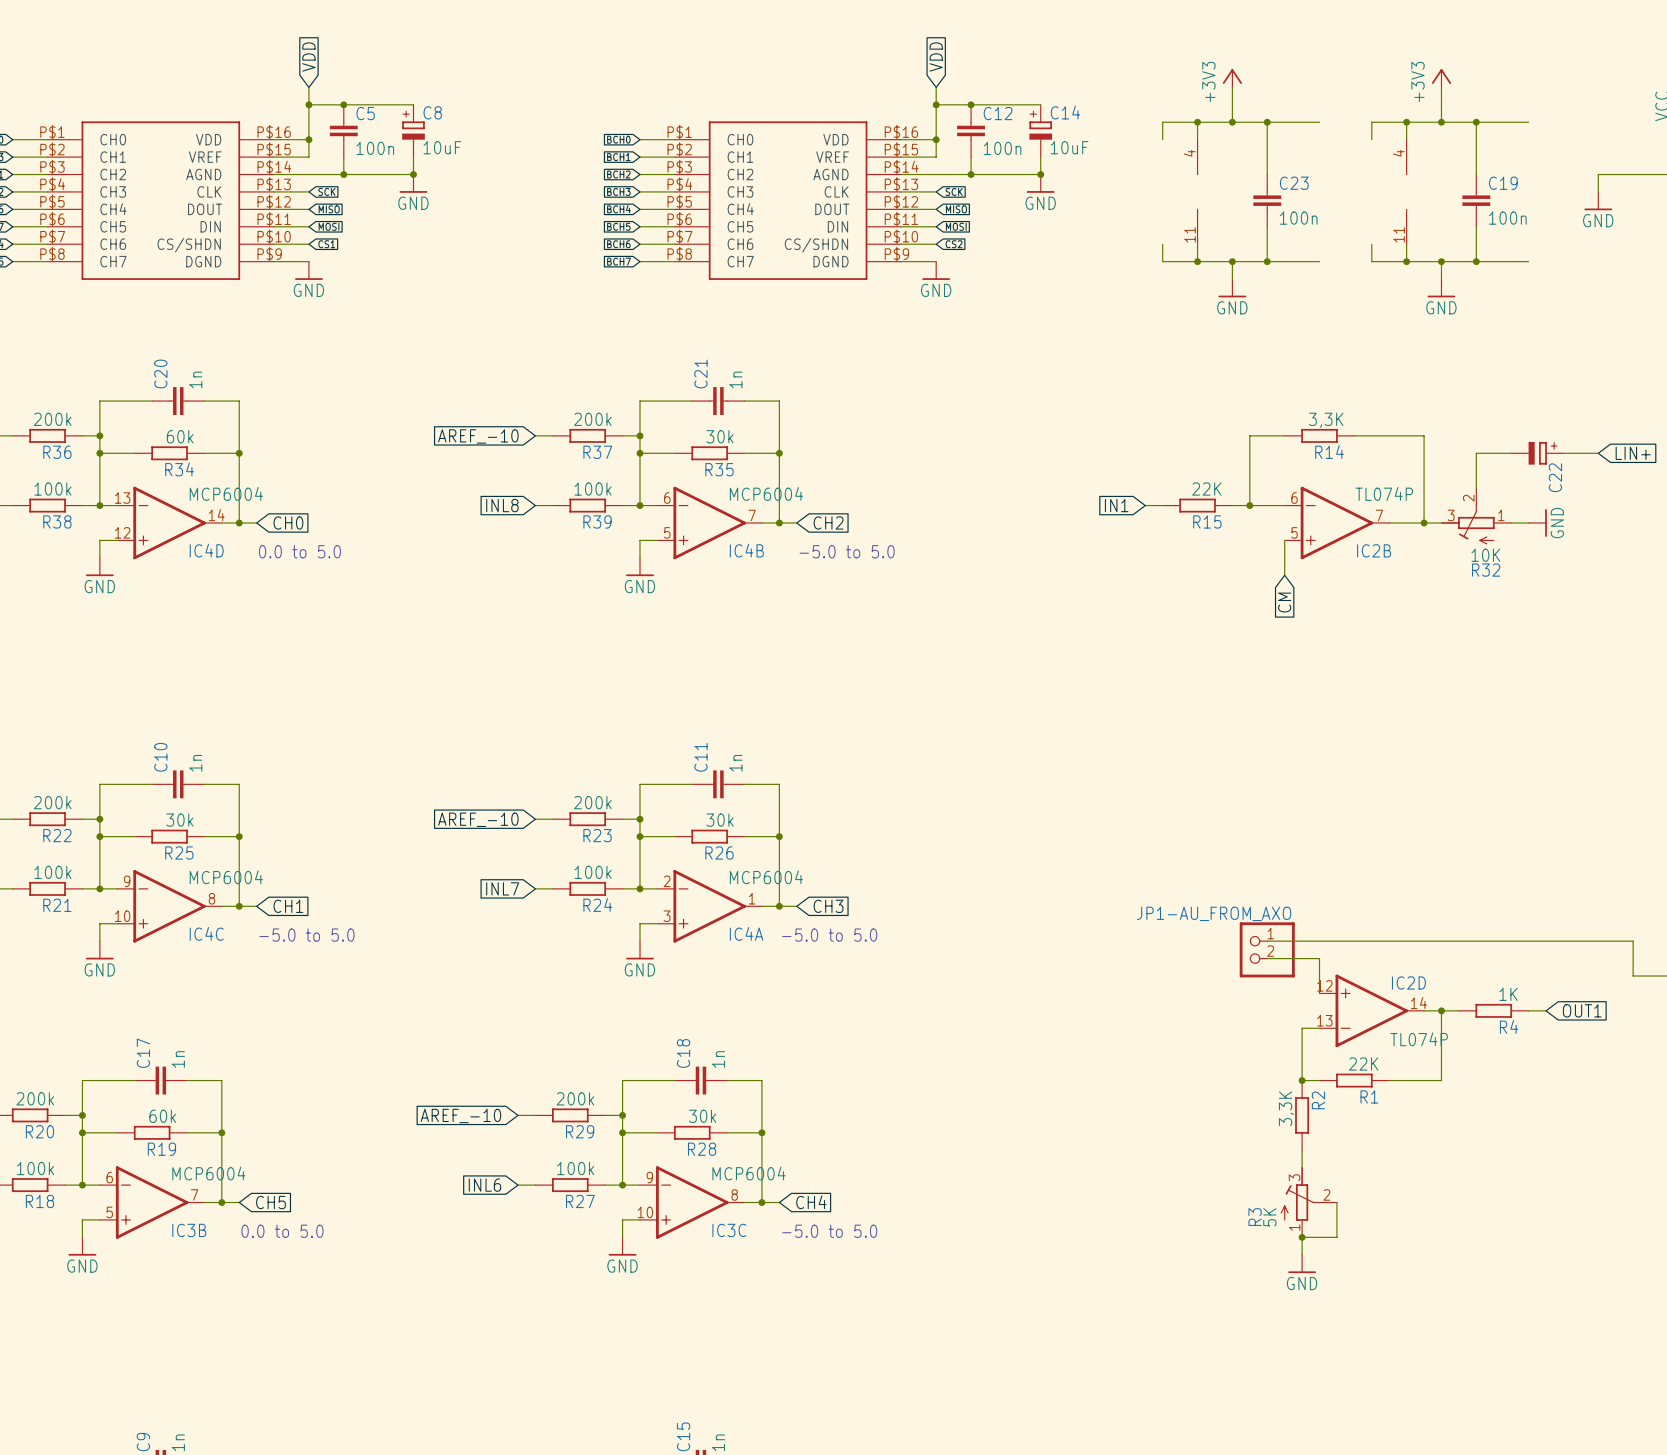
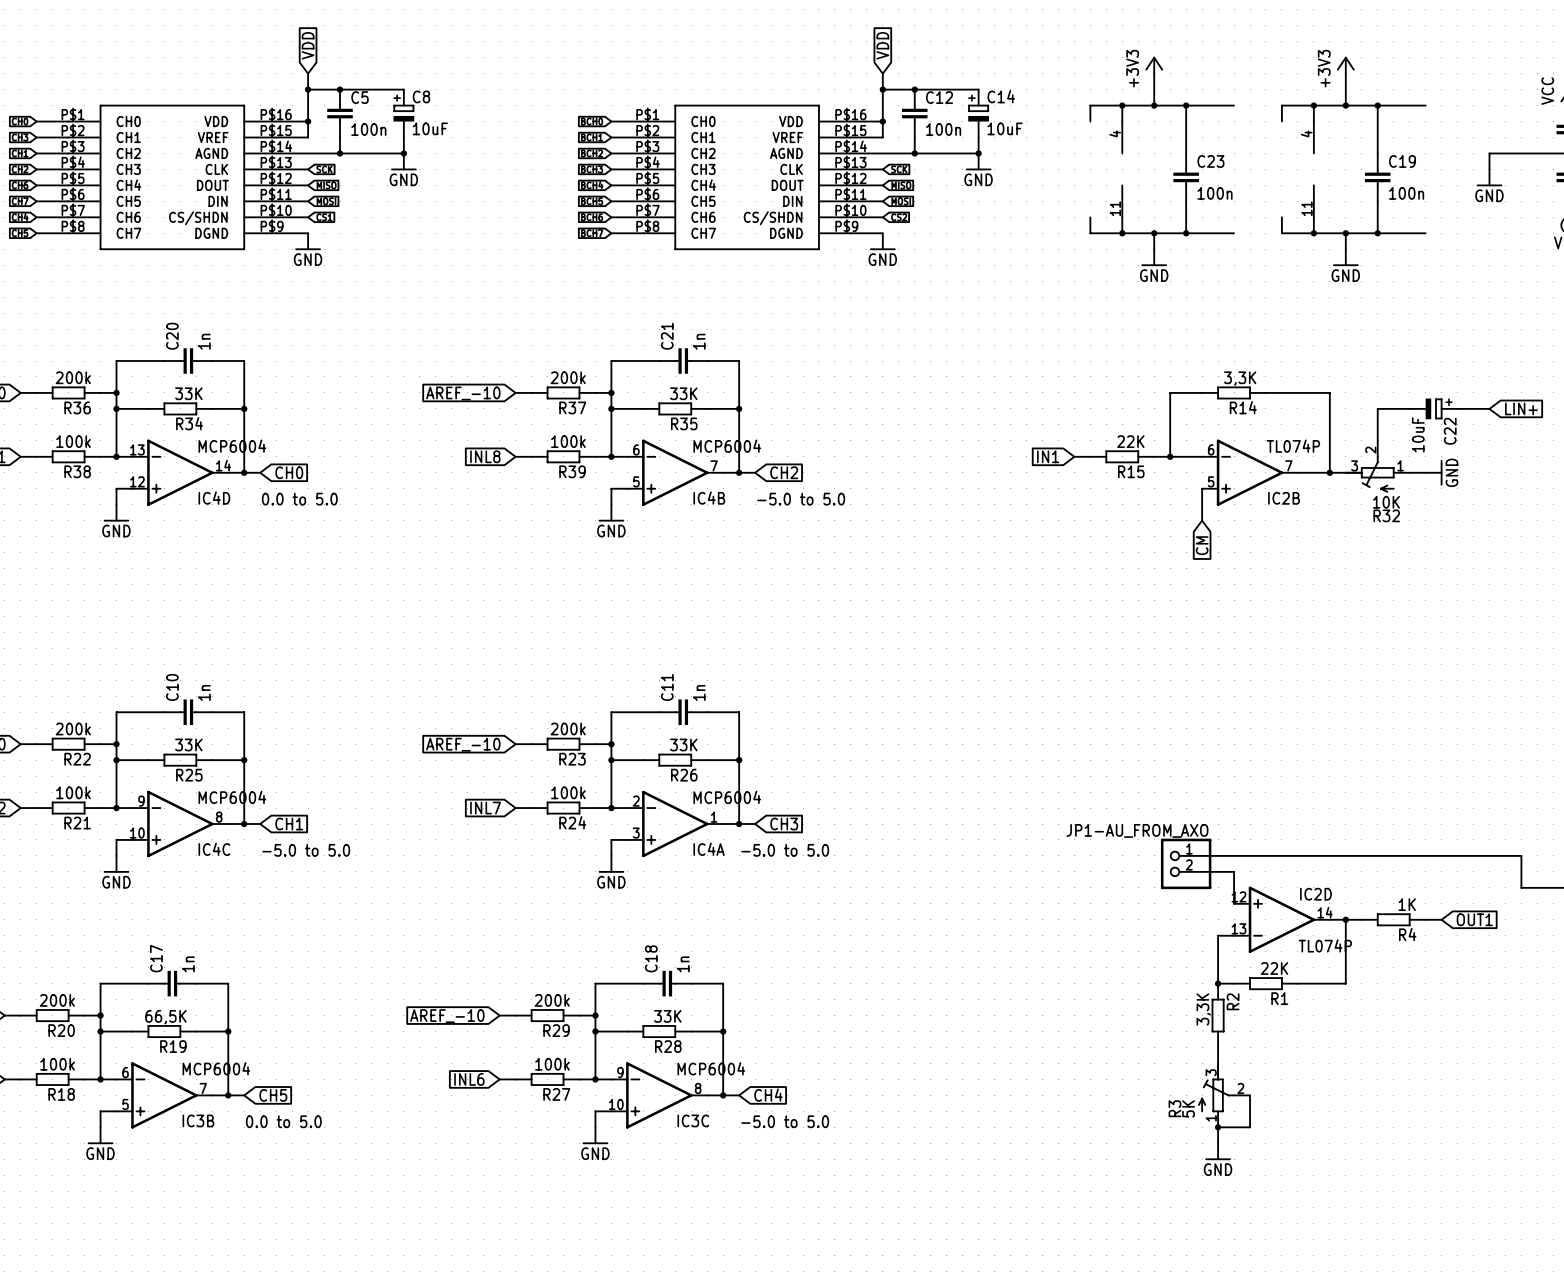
R34 value: 60k (180, 436) -> 33K (188, 393)
R35 value: 30k (720, 436) -> 33K (683, 393)
C22 value: none -> 10uF (1418, 434)
R25 value: 30k (179, 820) -> 33K (188, 744)
R26 value: 30k (720, 820) -> 33K (683, 744)
R19 value: 60k (162, 1116) -> 66,5K (165, 1017)
R28 value: 30k (702, 1116) -> 33K (667, 1016)

